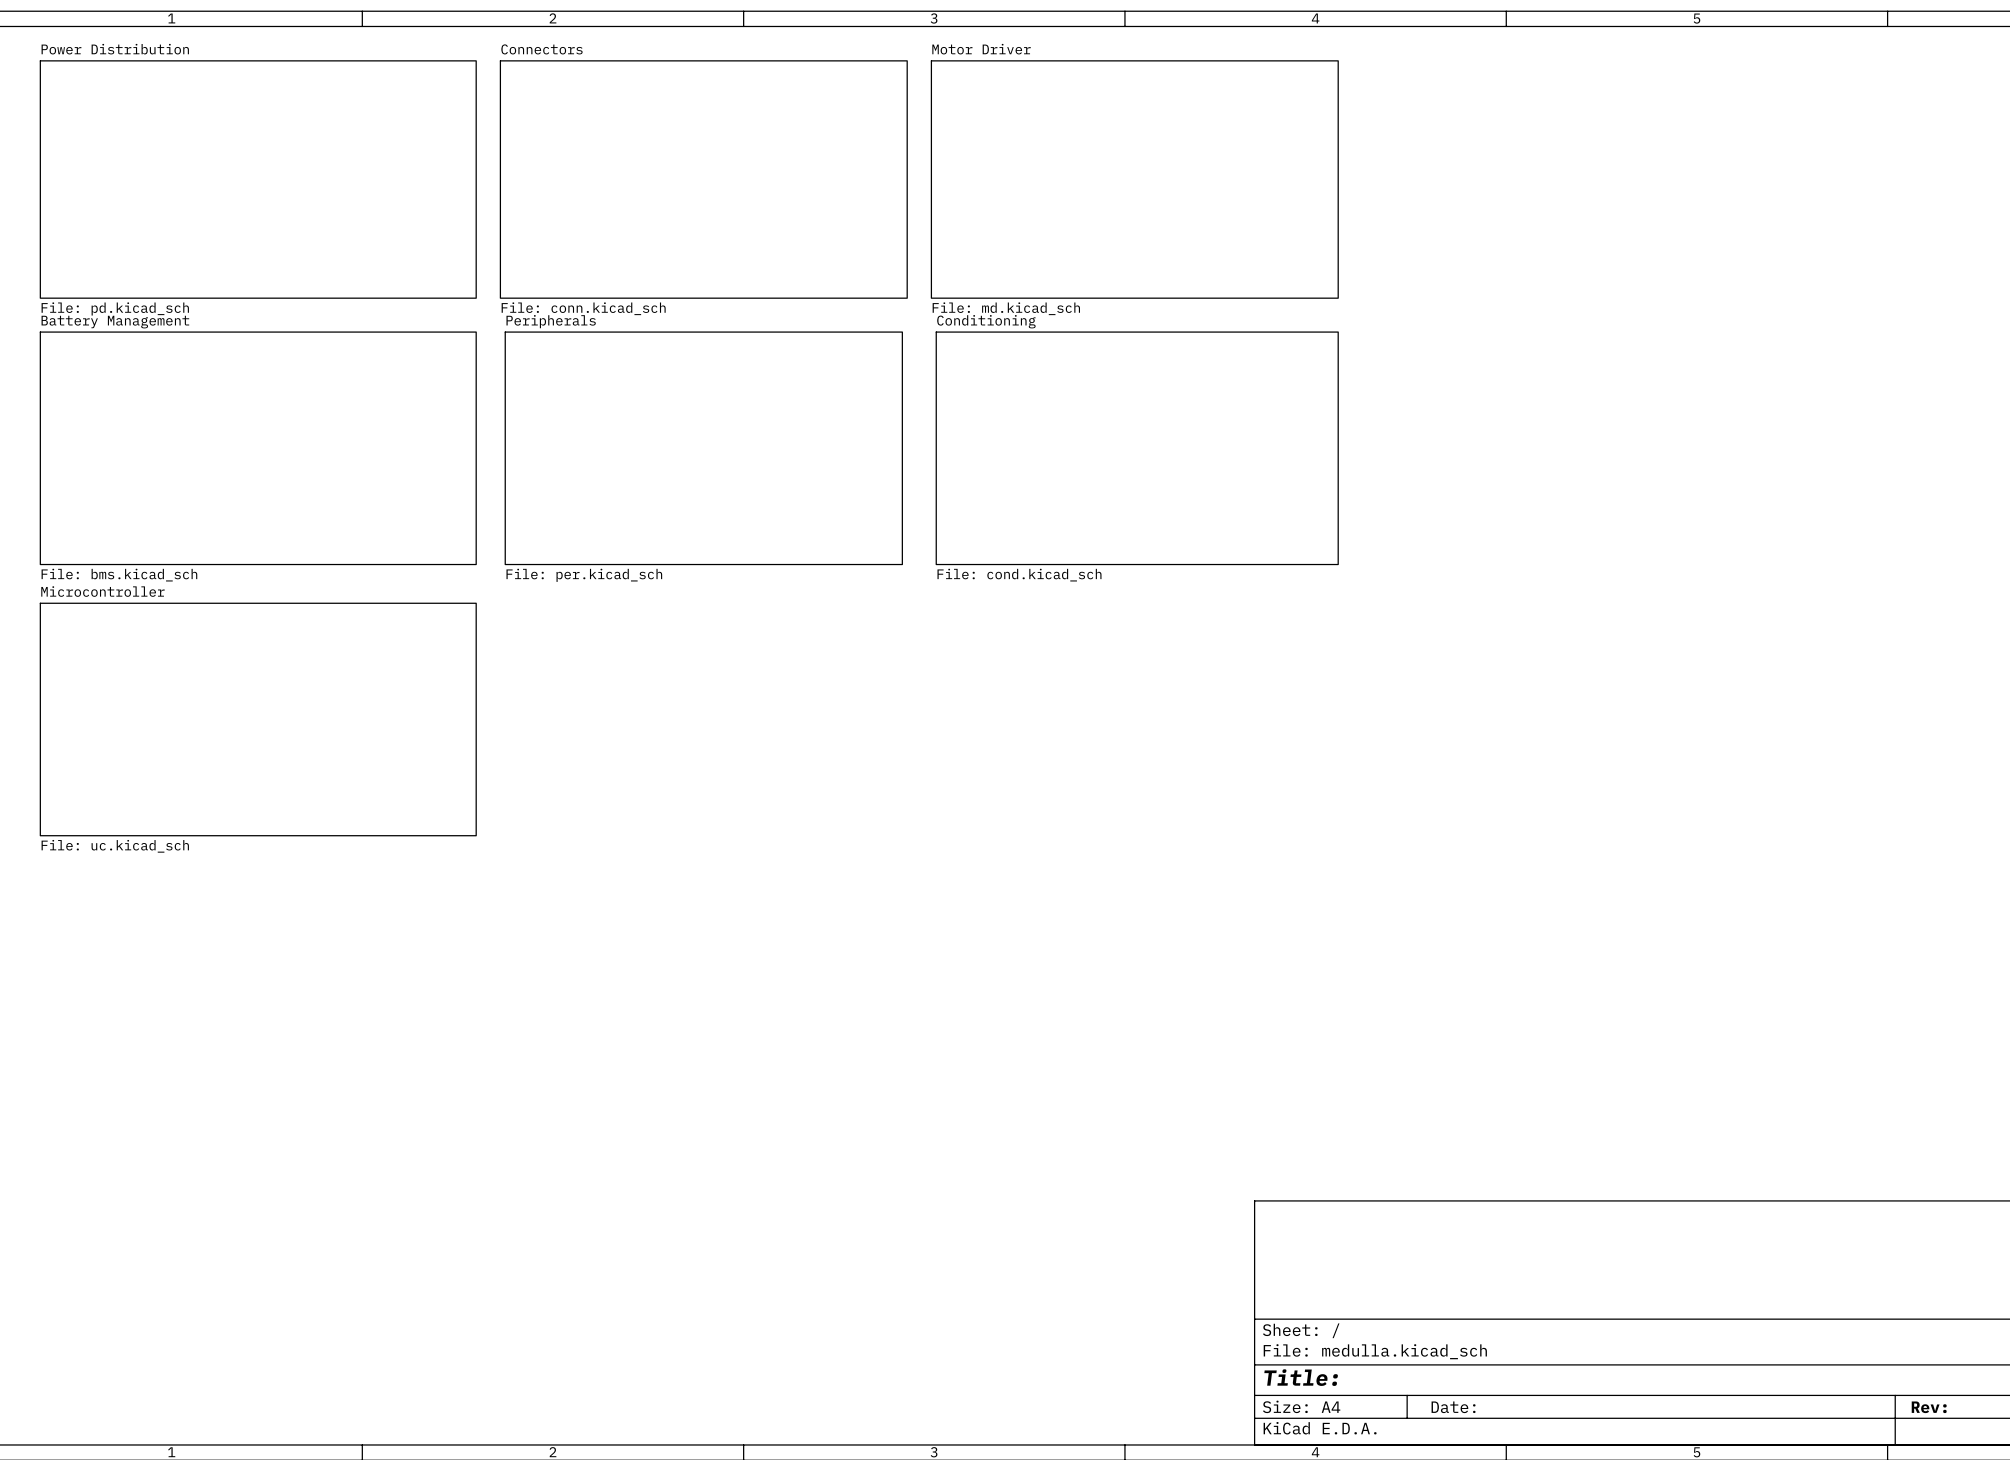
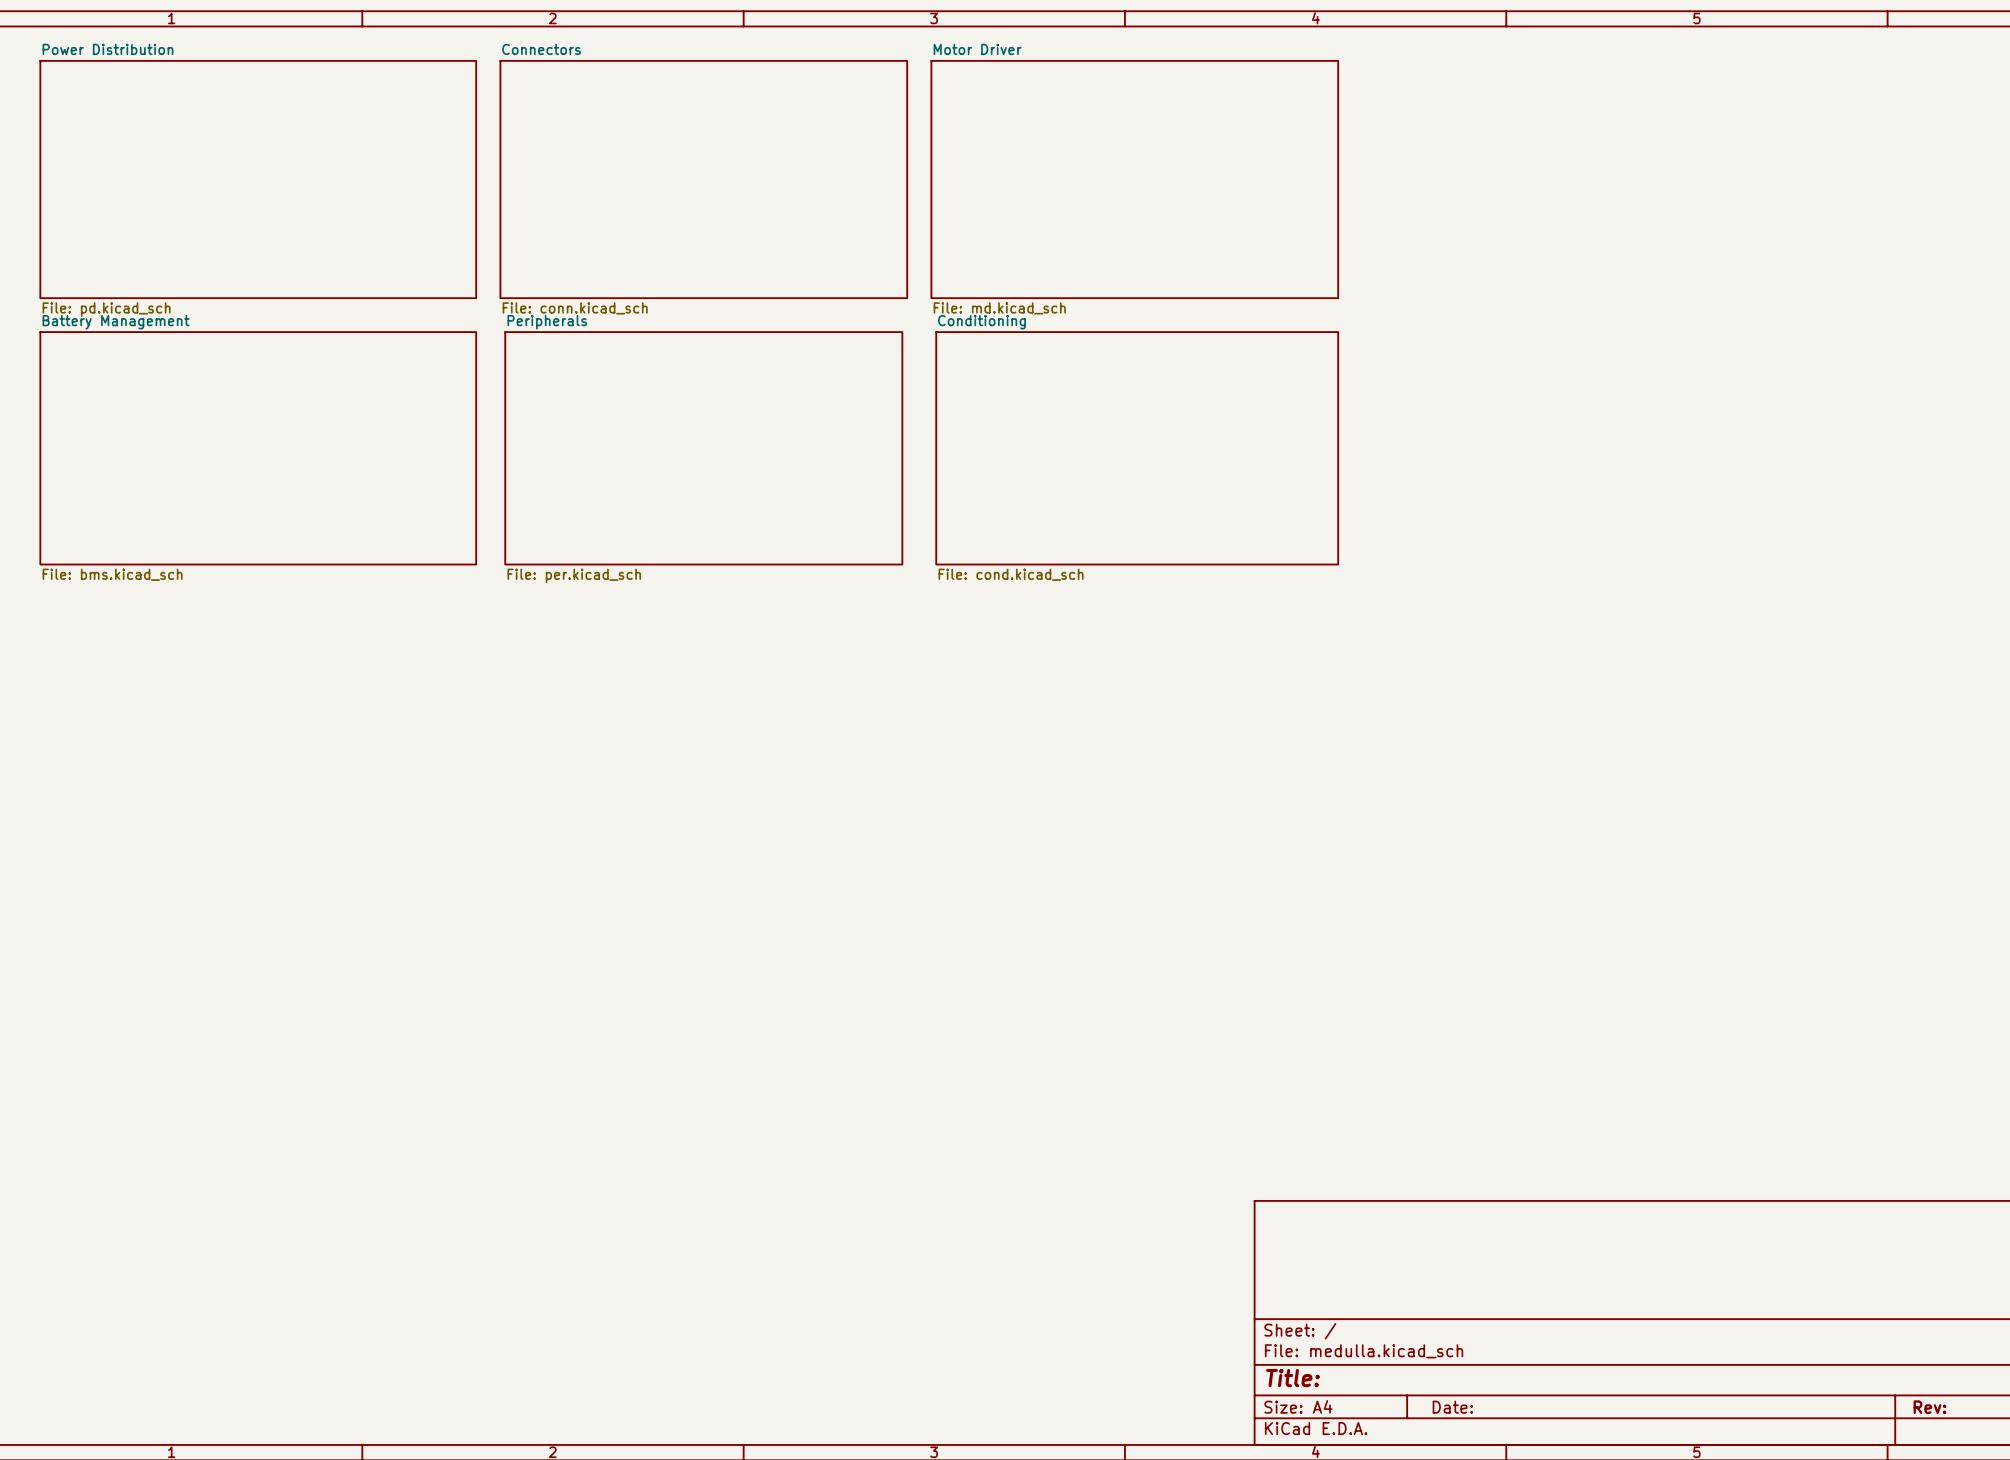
sheet Microcontroller: File: uc.kicad_sch (258, 719) -> none

